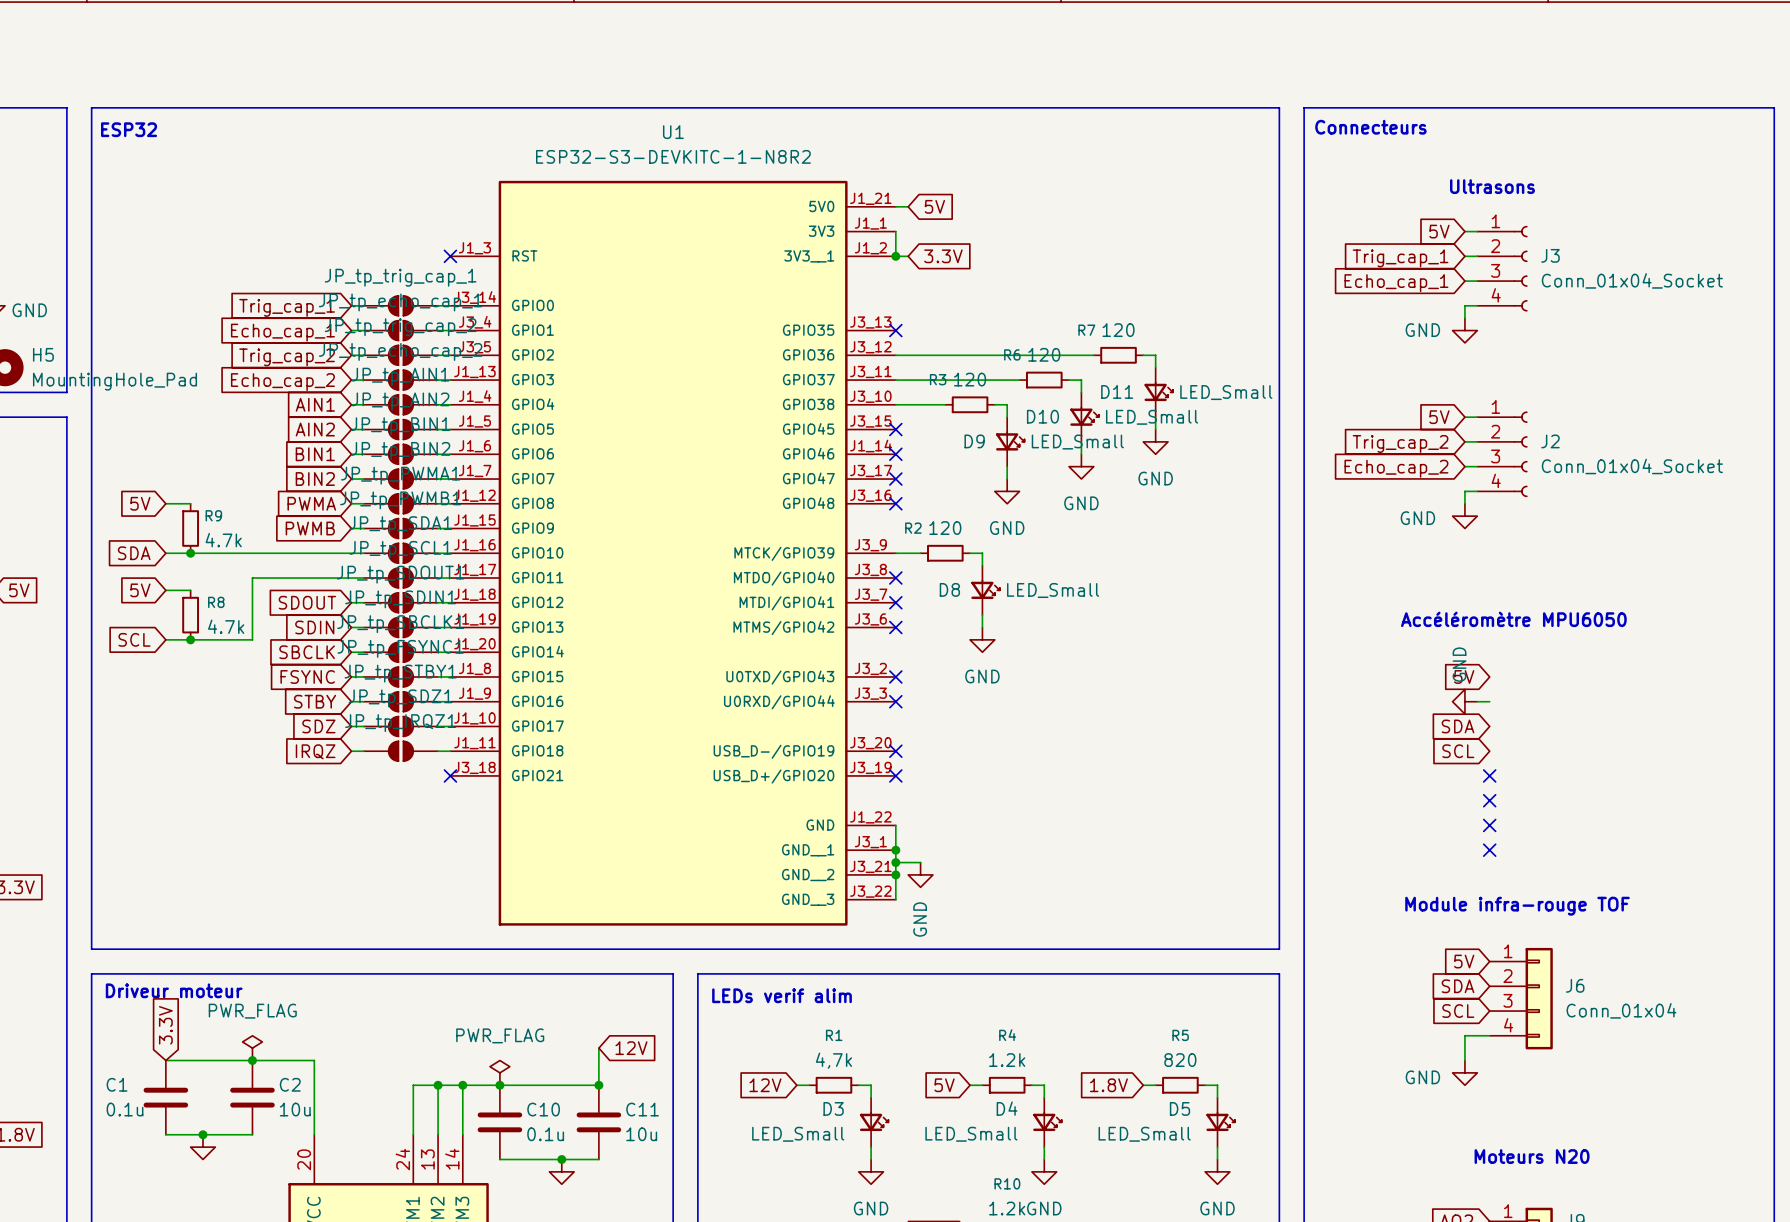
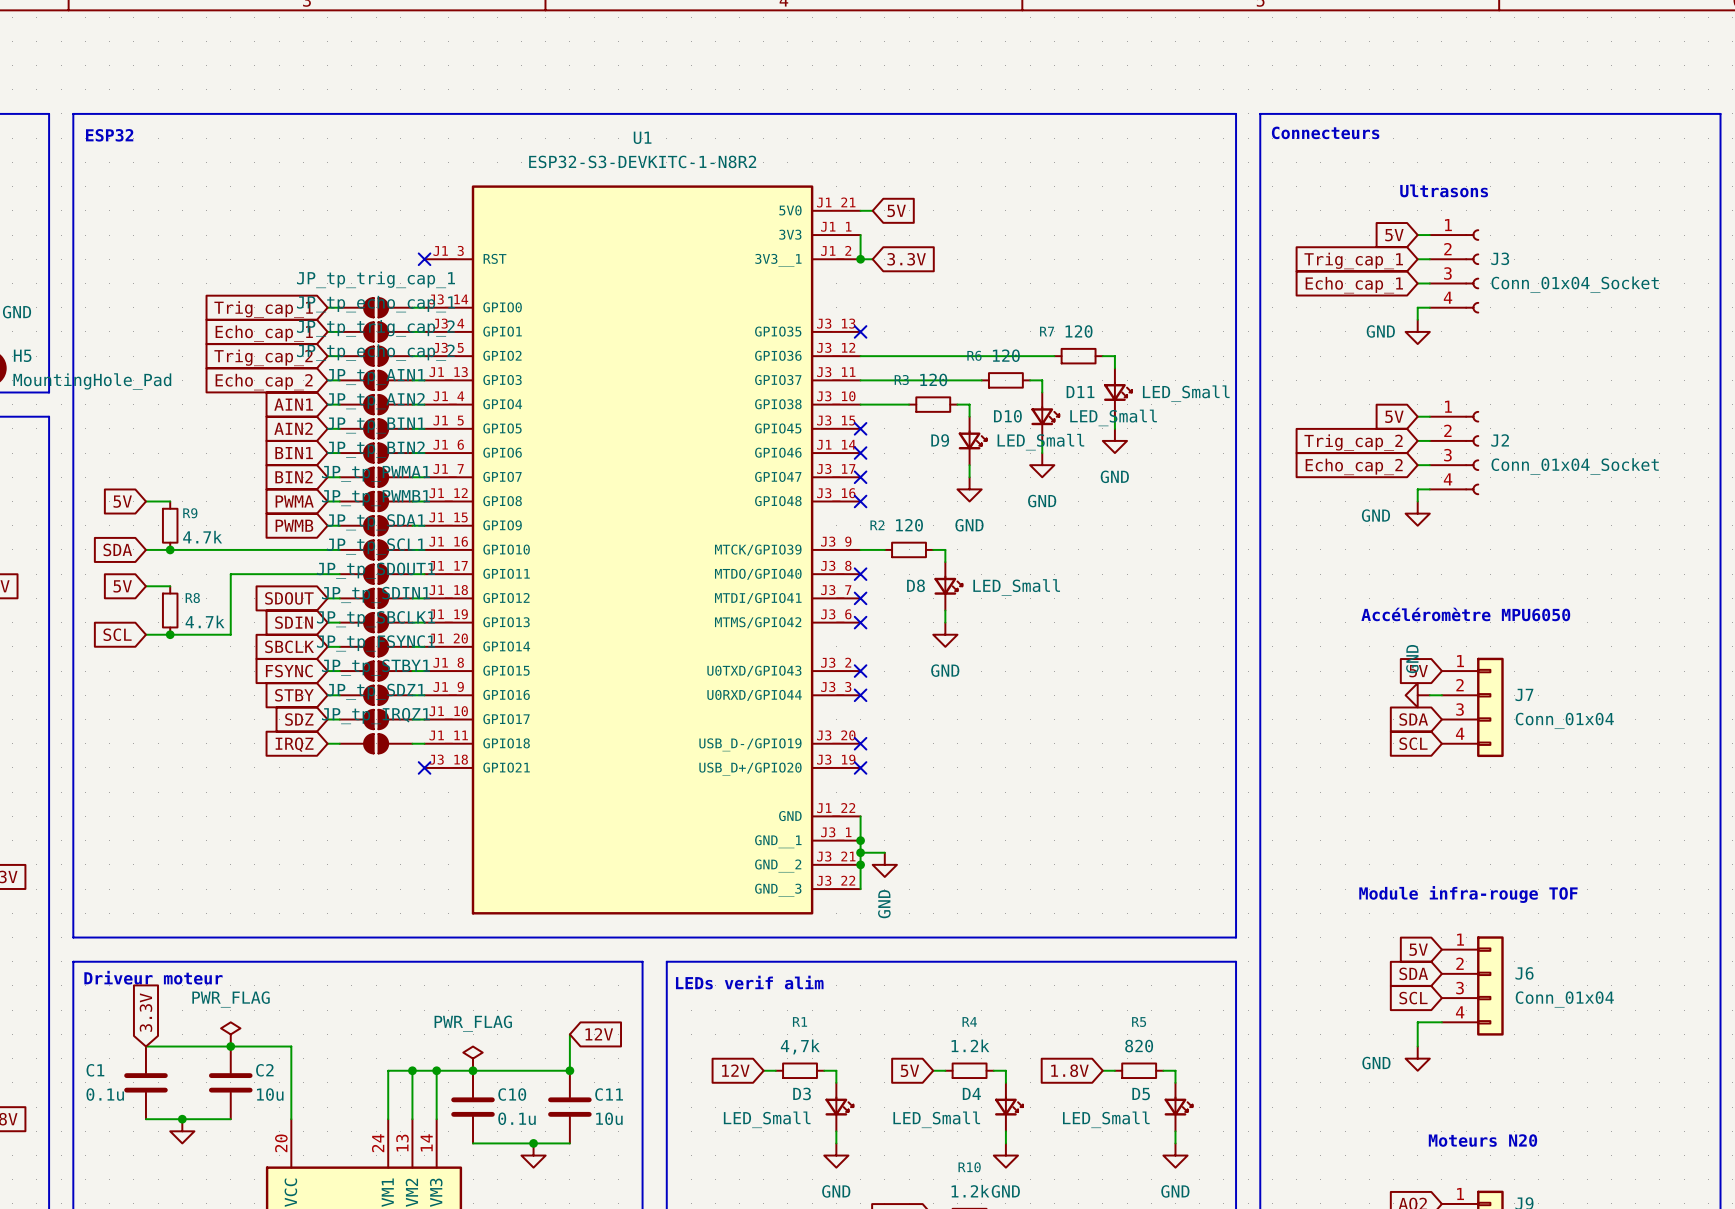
J7: none -> Conn_01x04 (1472, 707)
no-connect mark: (1489, 775) -> none
no-connect mark: (1489, 800) -> none
no-connect mark: (1489, 825) -> none
no-connect mark: (1489, 850) -> none

